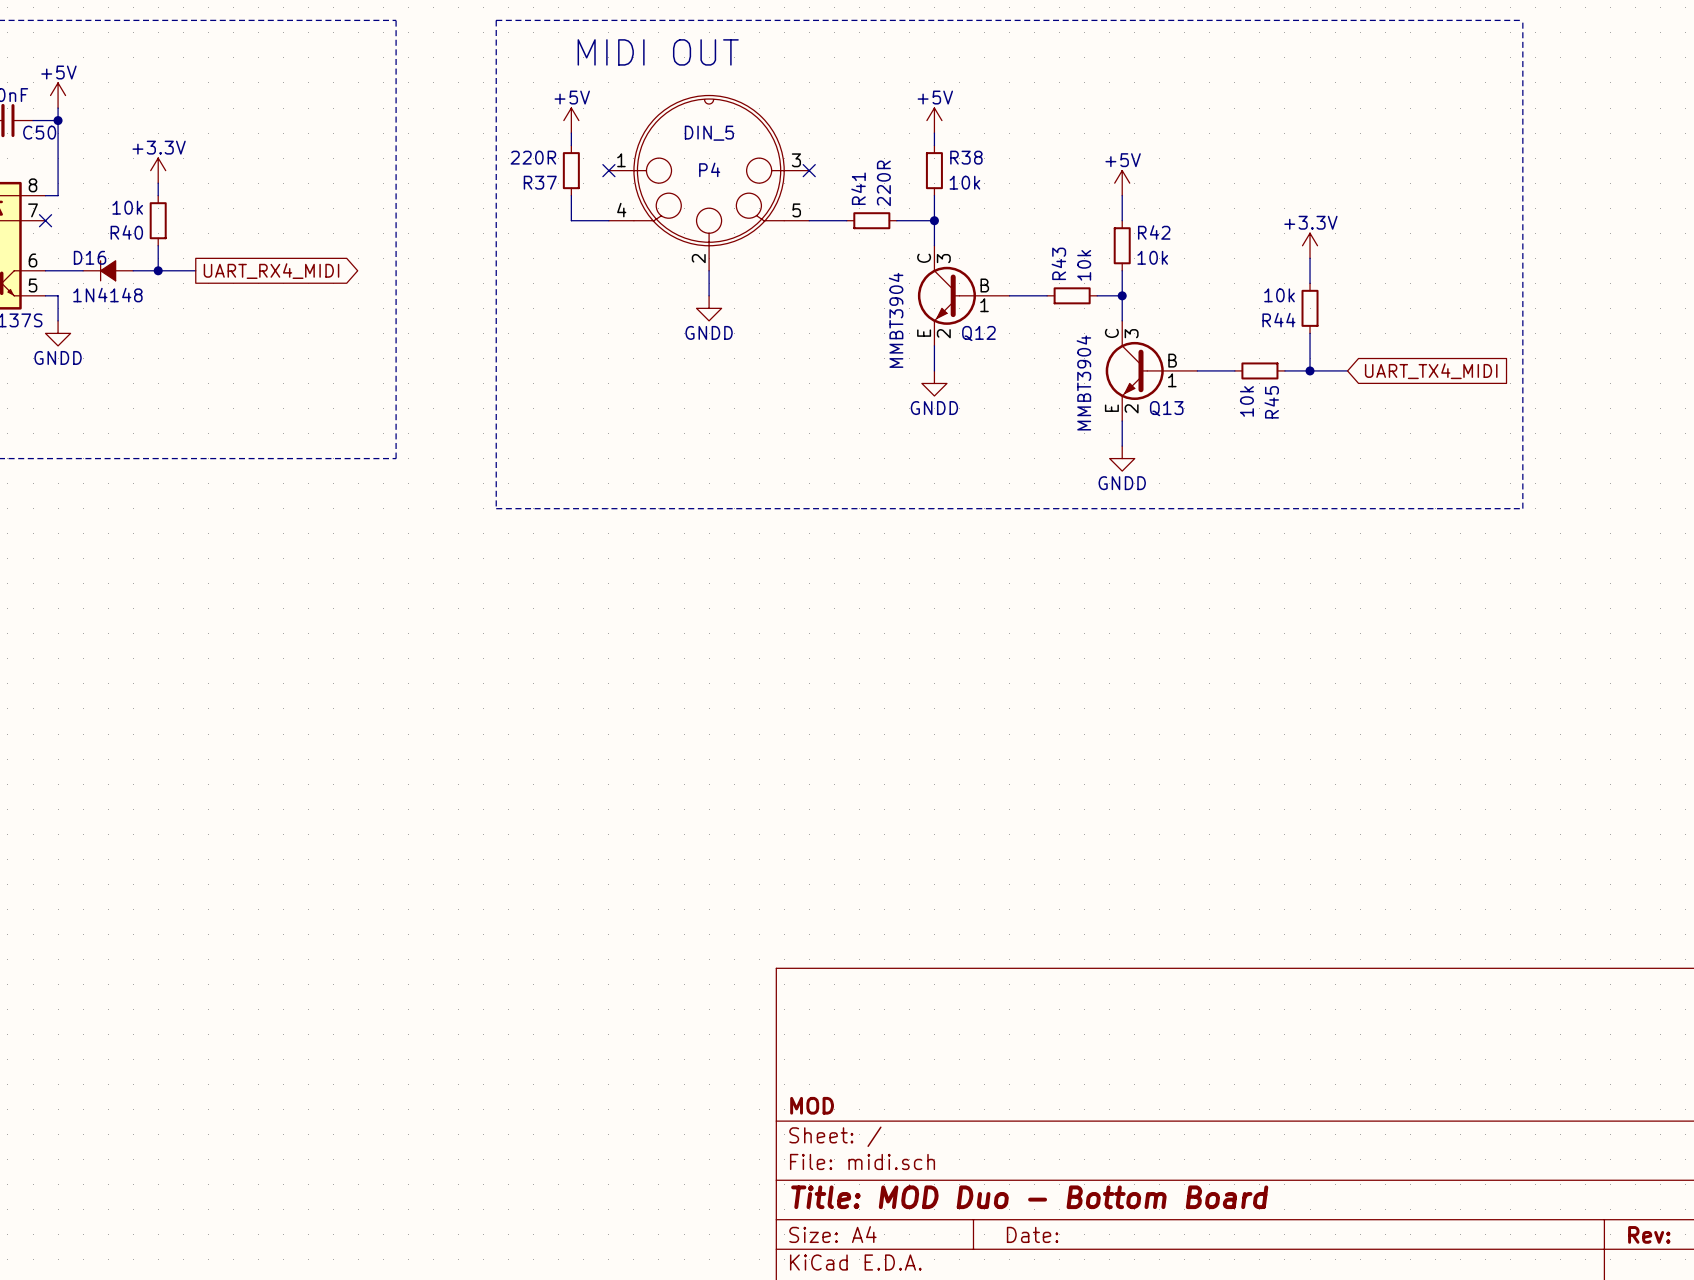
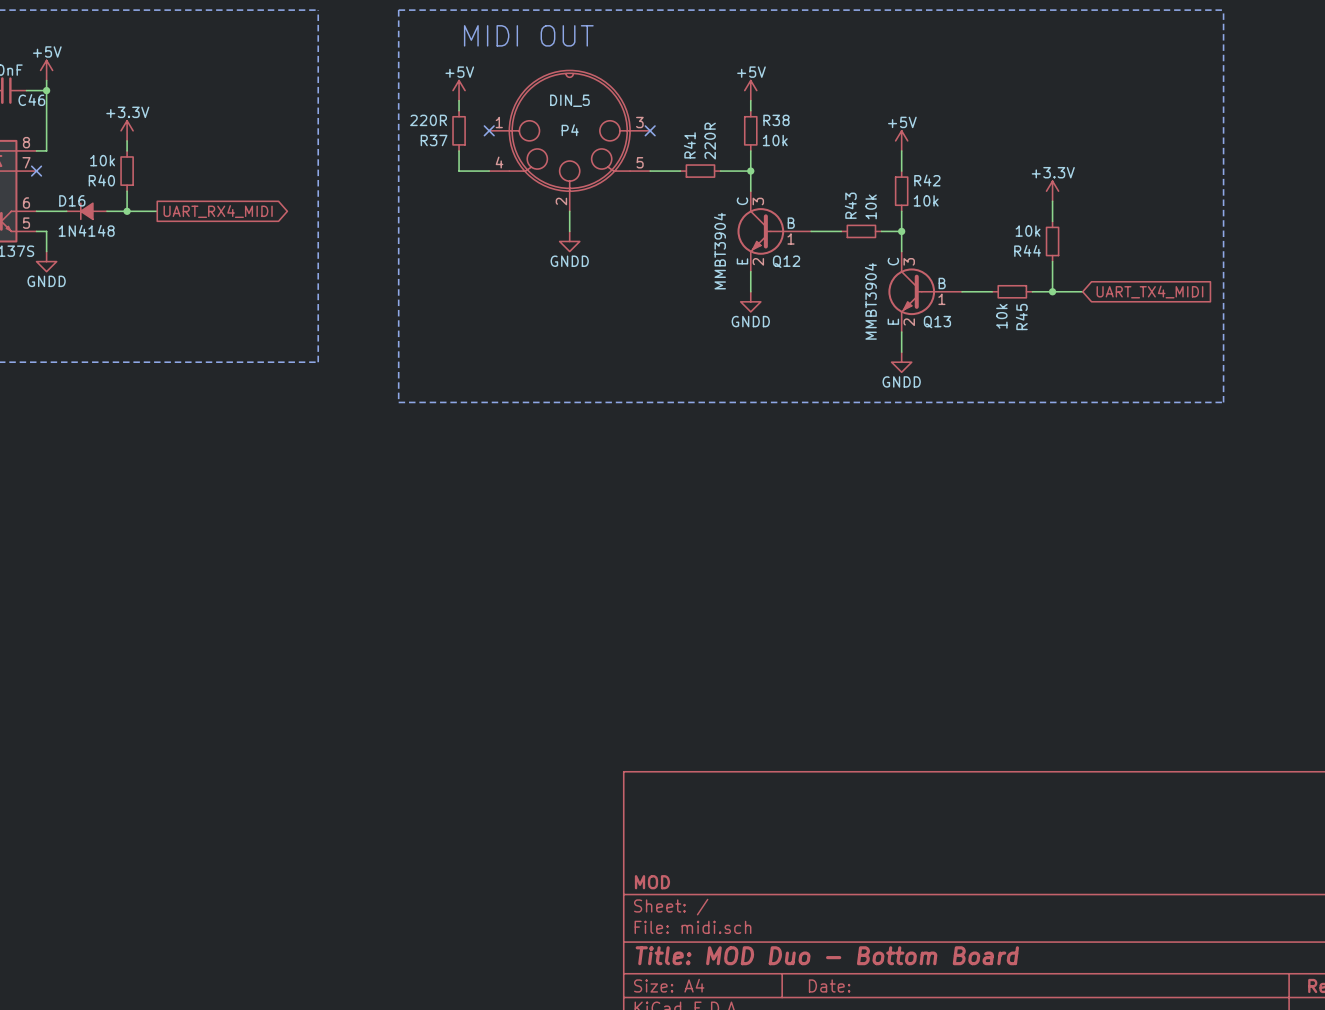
C50 name: C50 (39, 132) -> C46 (31, 100)

